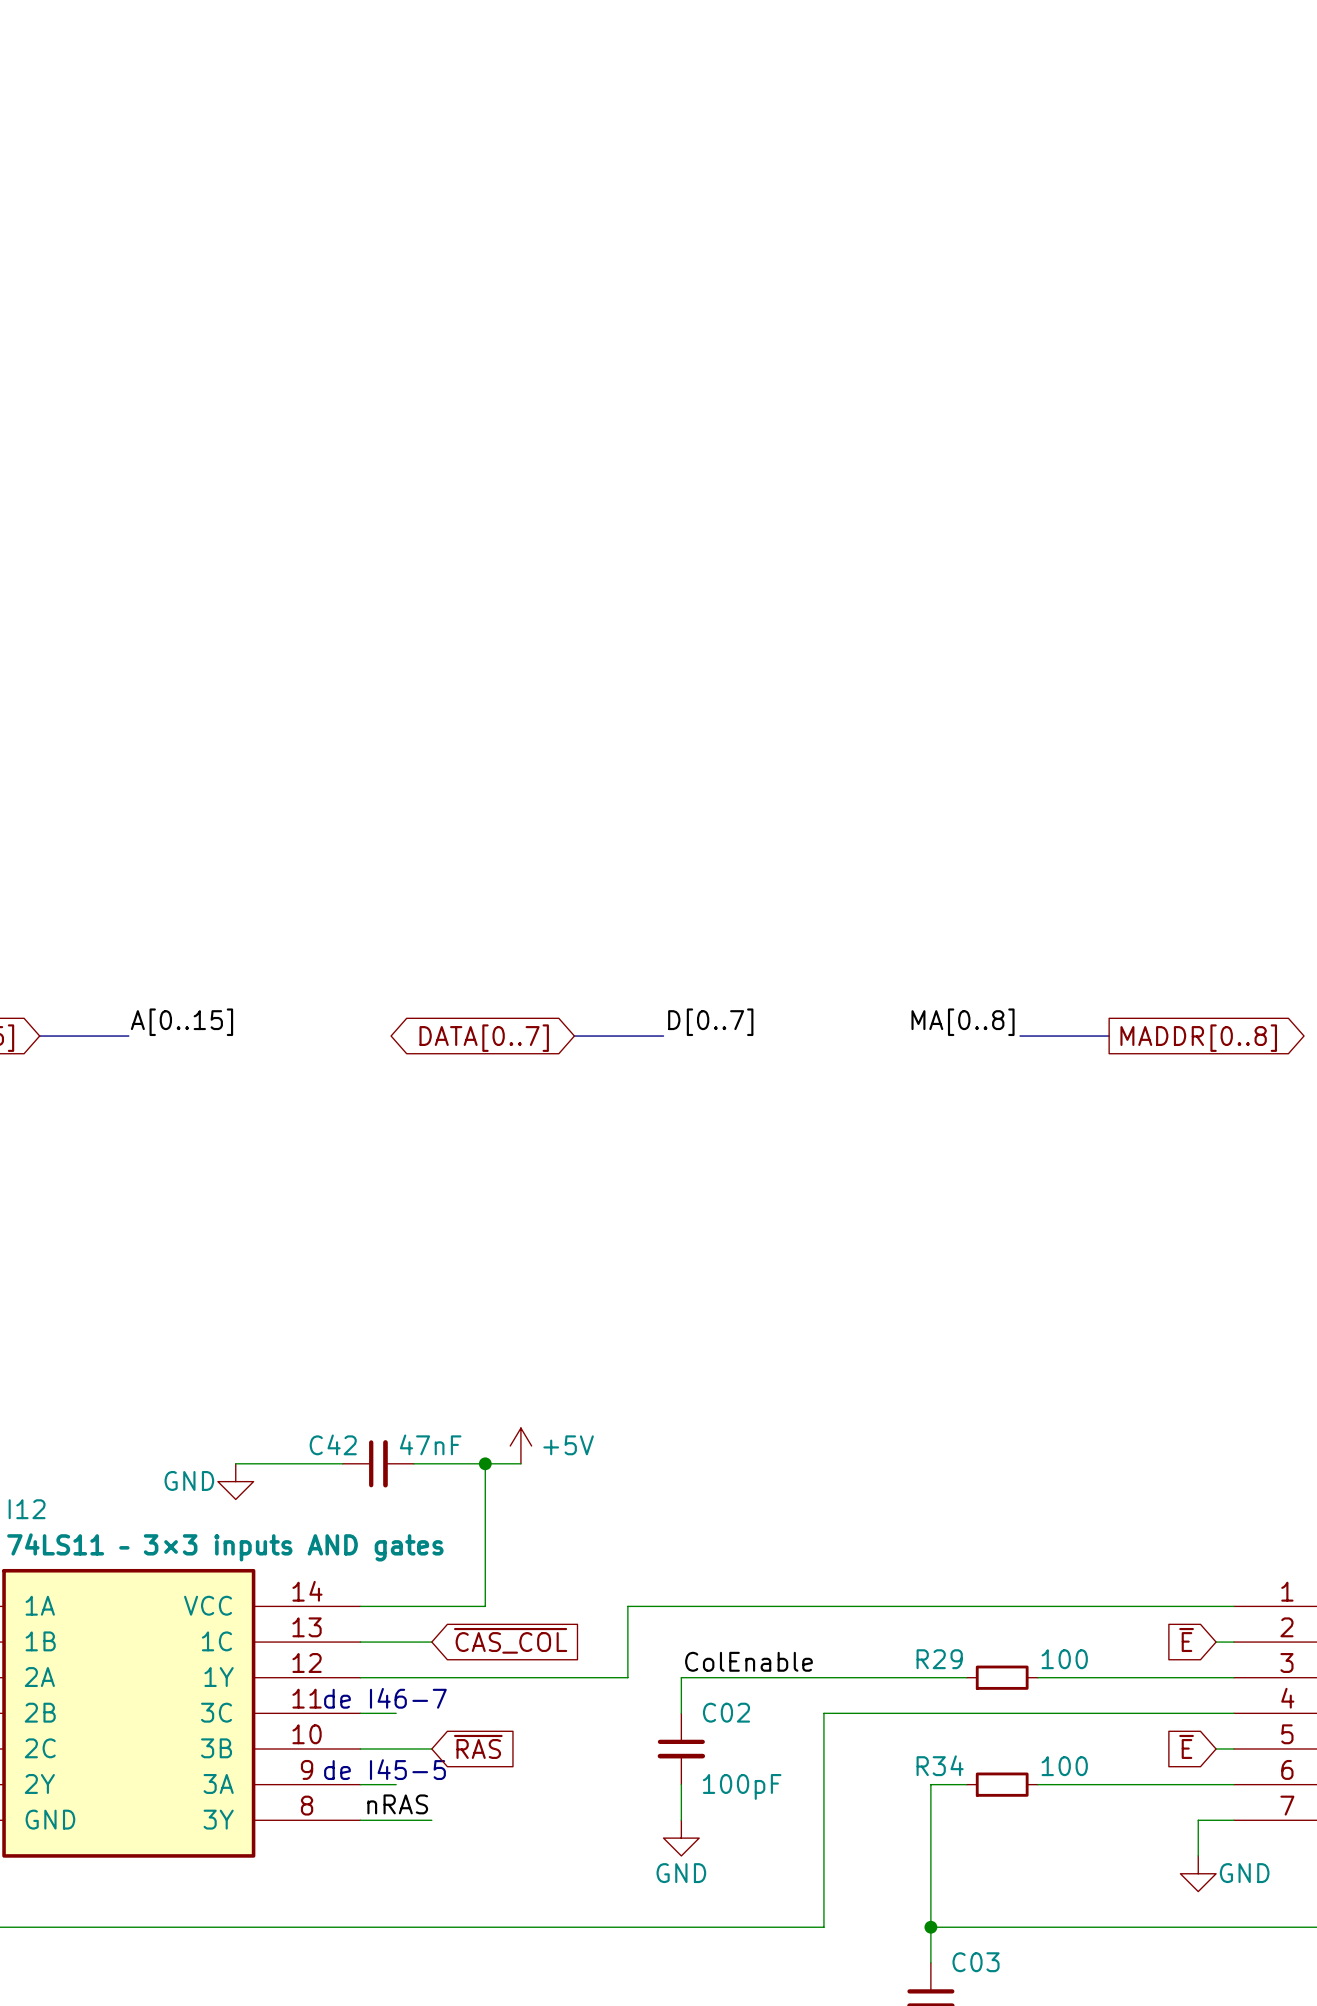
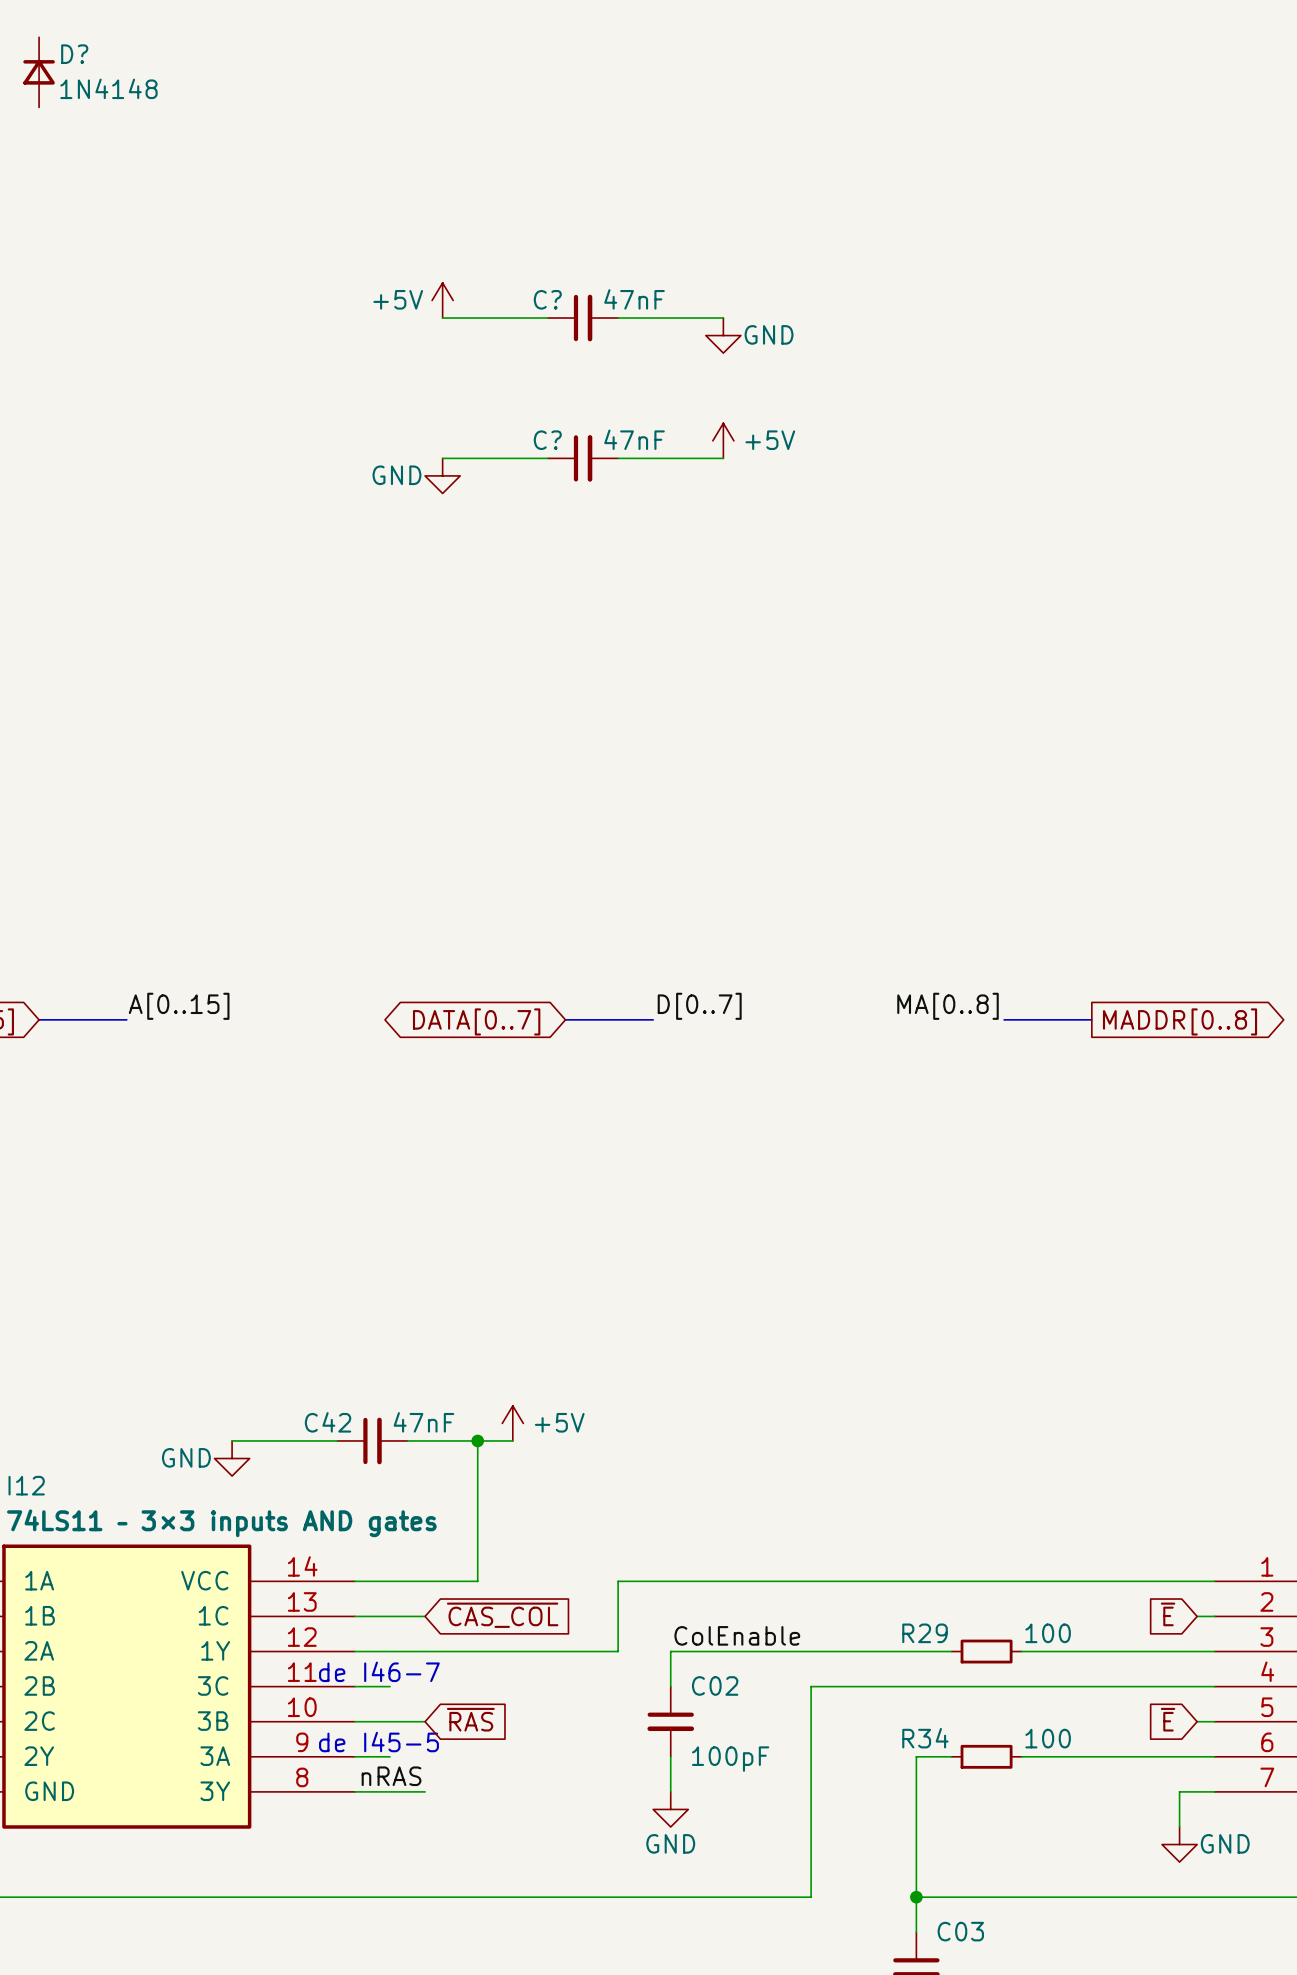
D?: none -> 1N4148 (39, 72)
power symbol: none -> +5V (442, 300)
wire: none -> (442, 318) (547, 318)
C?: none -> 47nF (583, 318)
wire: none -> (618, 318) (723, 318)
power symbol: none -> GND (723, 335)
power symbol: none -> +5V (723, 440)
wire: none -> (442, 458) (547, 458)
C?: none -> 47nF (583, 458)
wire: none -> (618, 458) (723, 458)
power symbol: none -> GND (442, 475)

